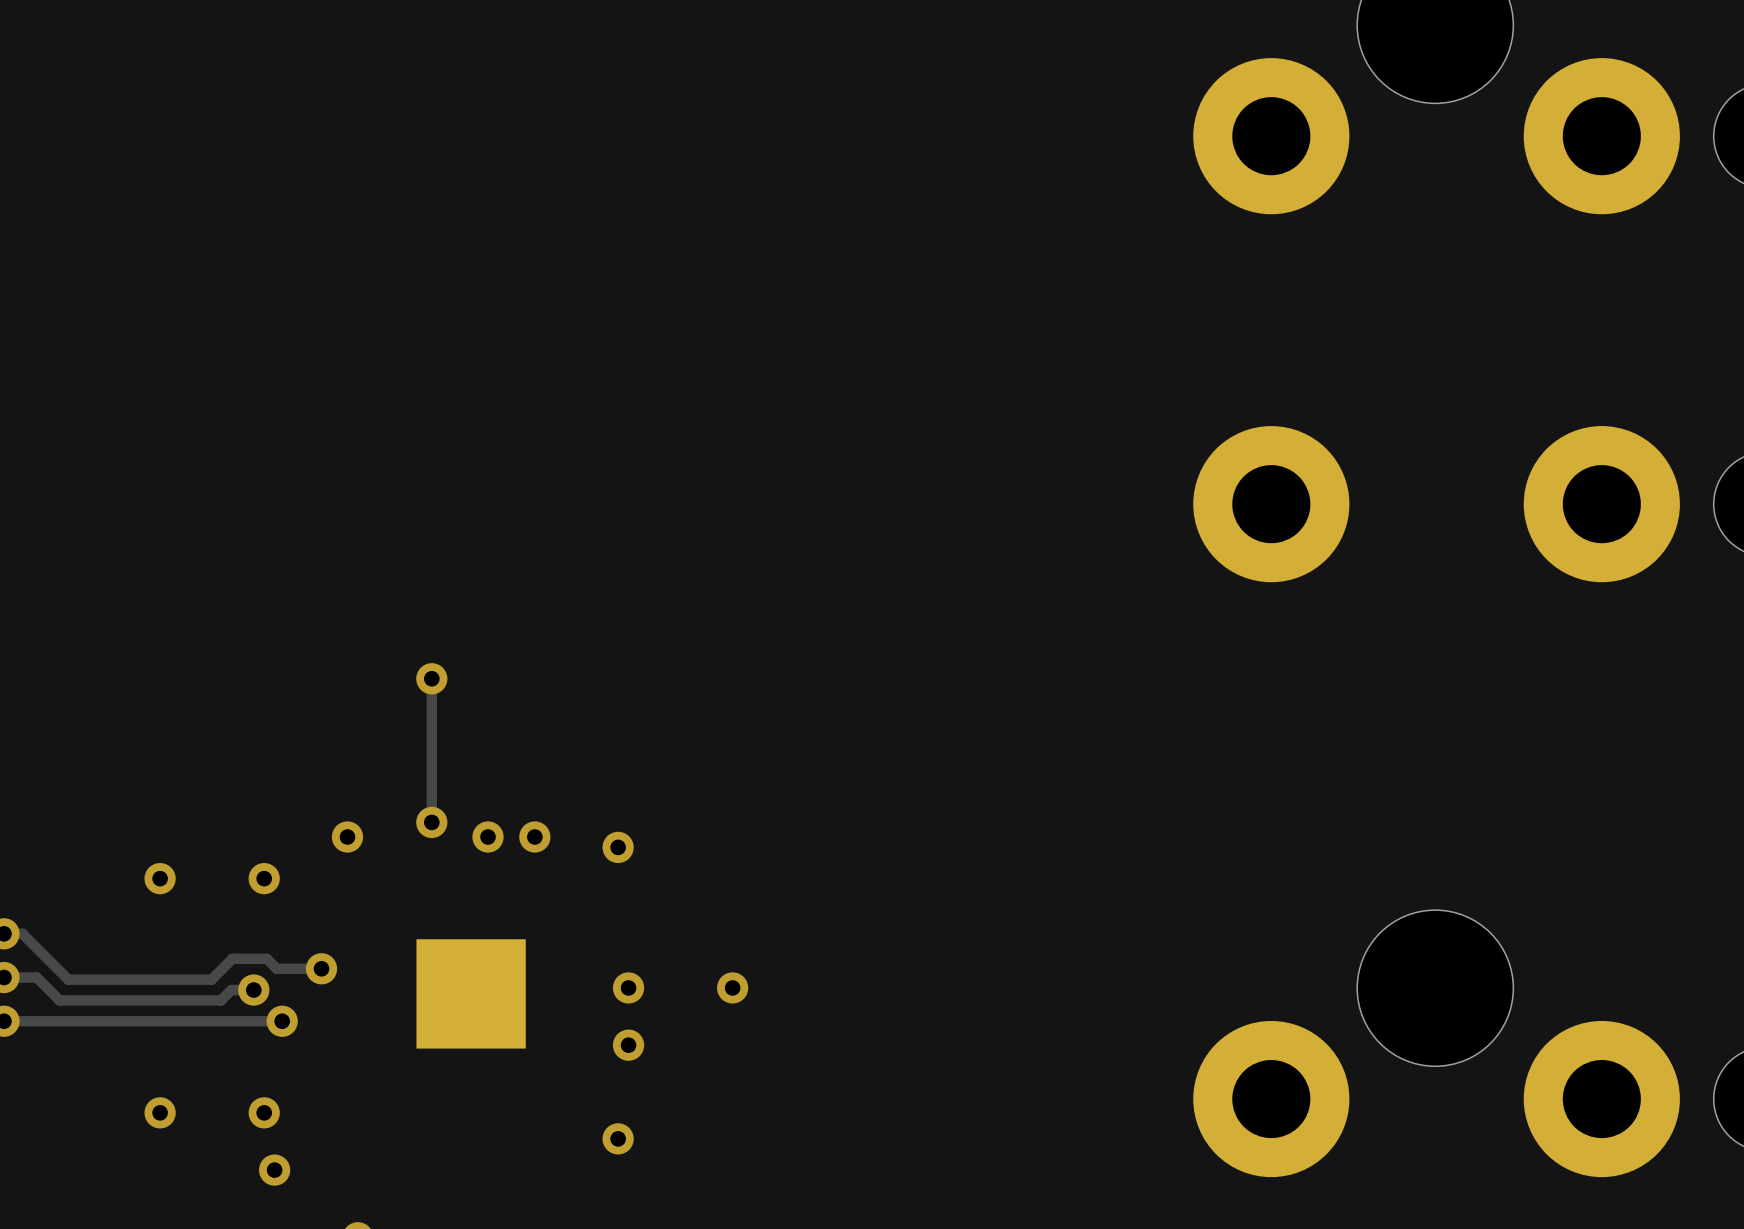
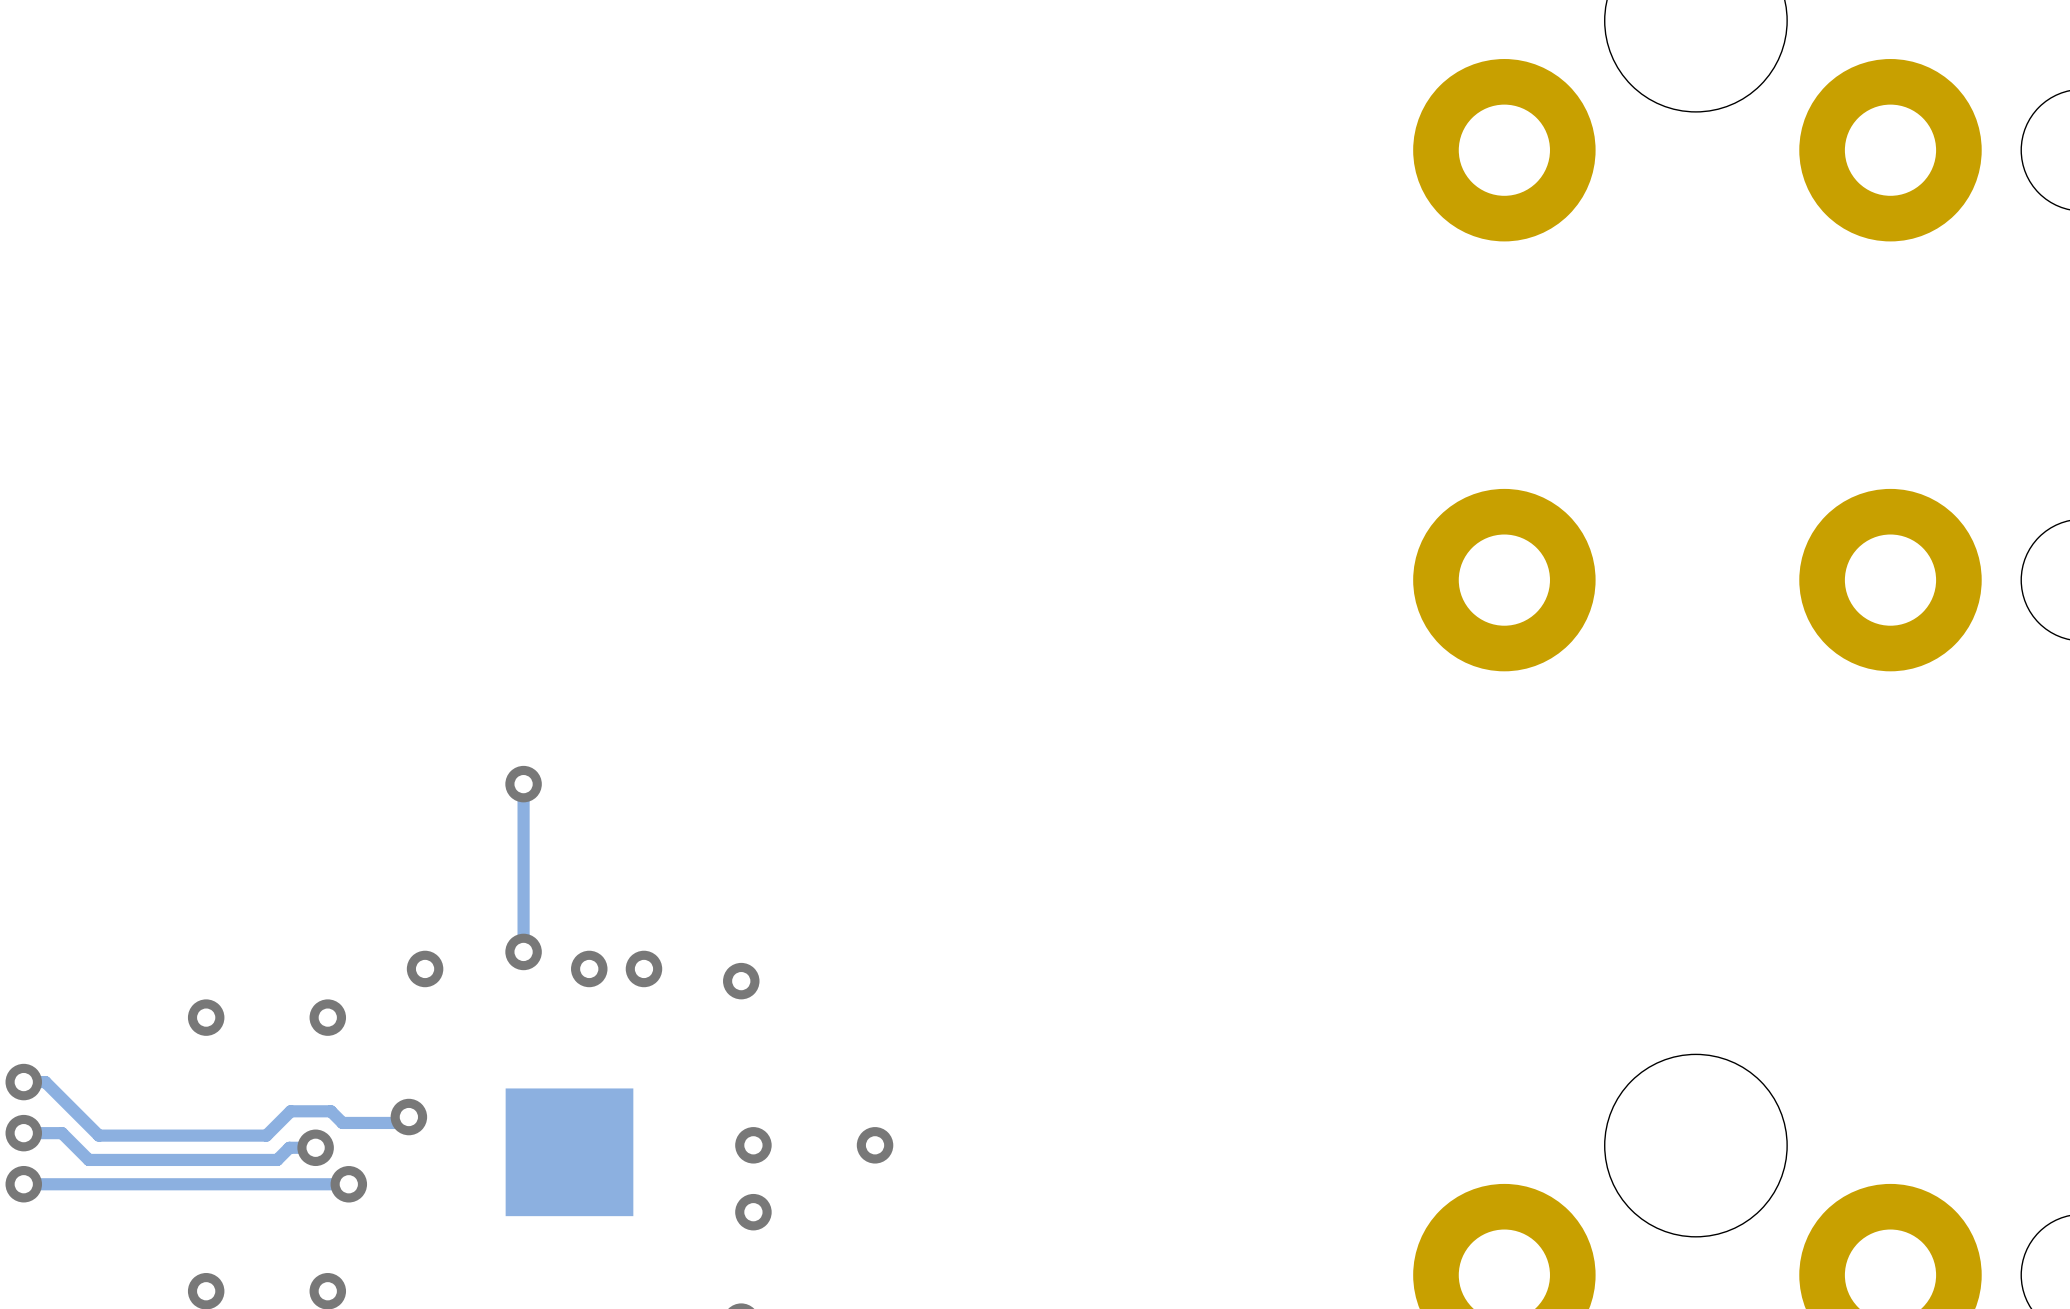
via position: (321, 968) -> (408, 1117)

